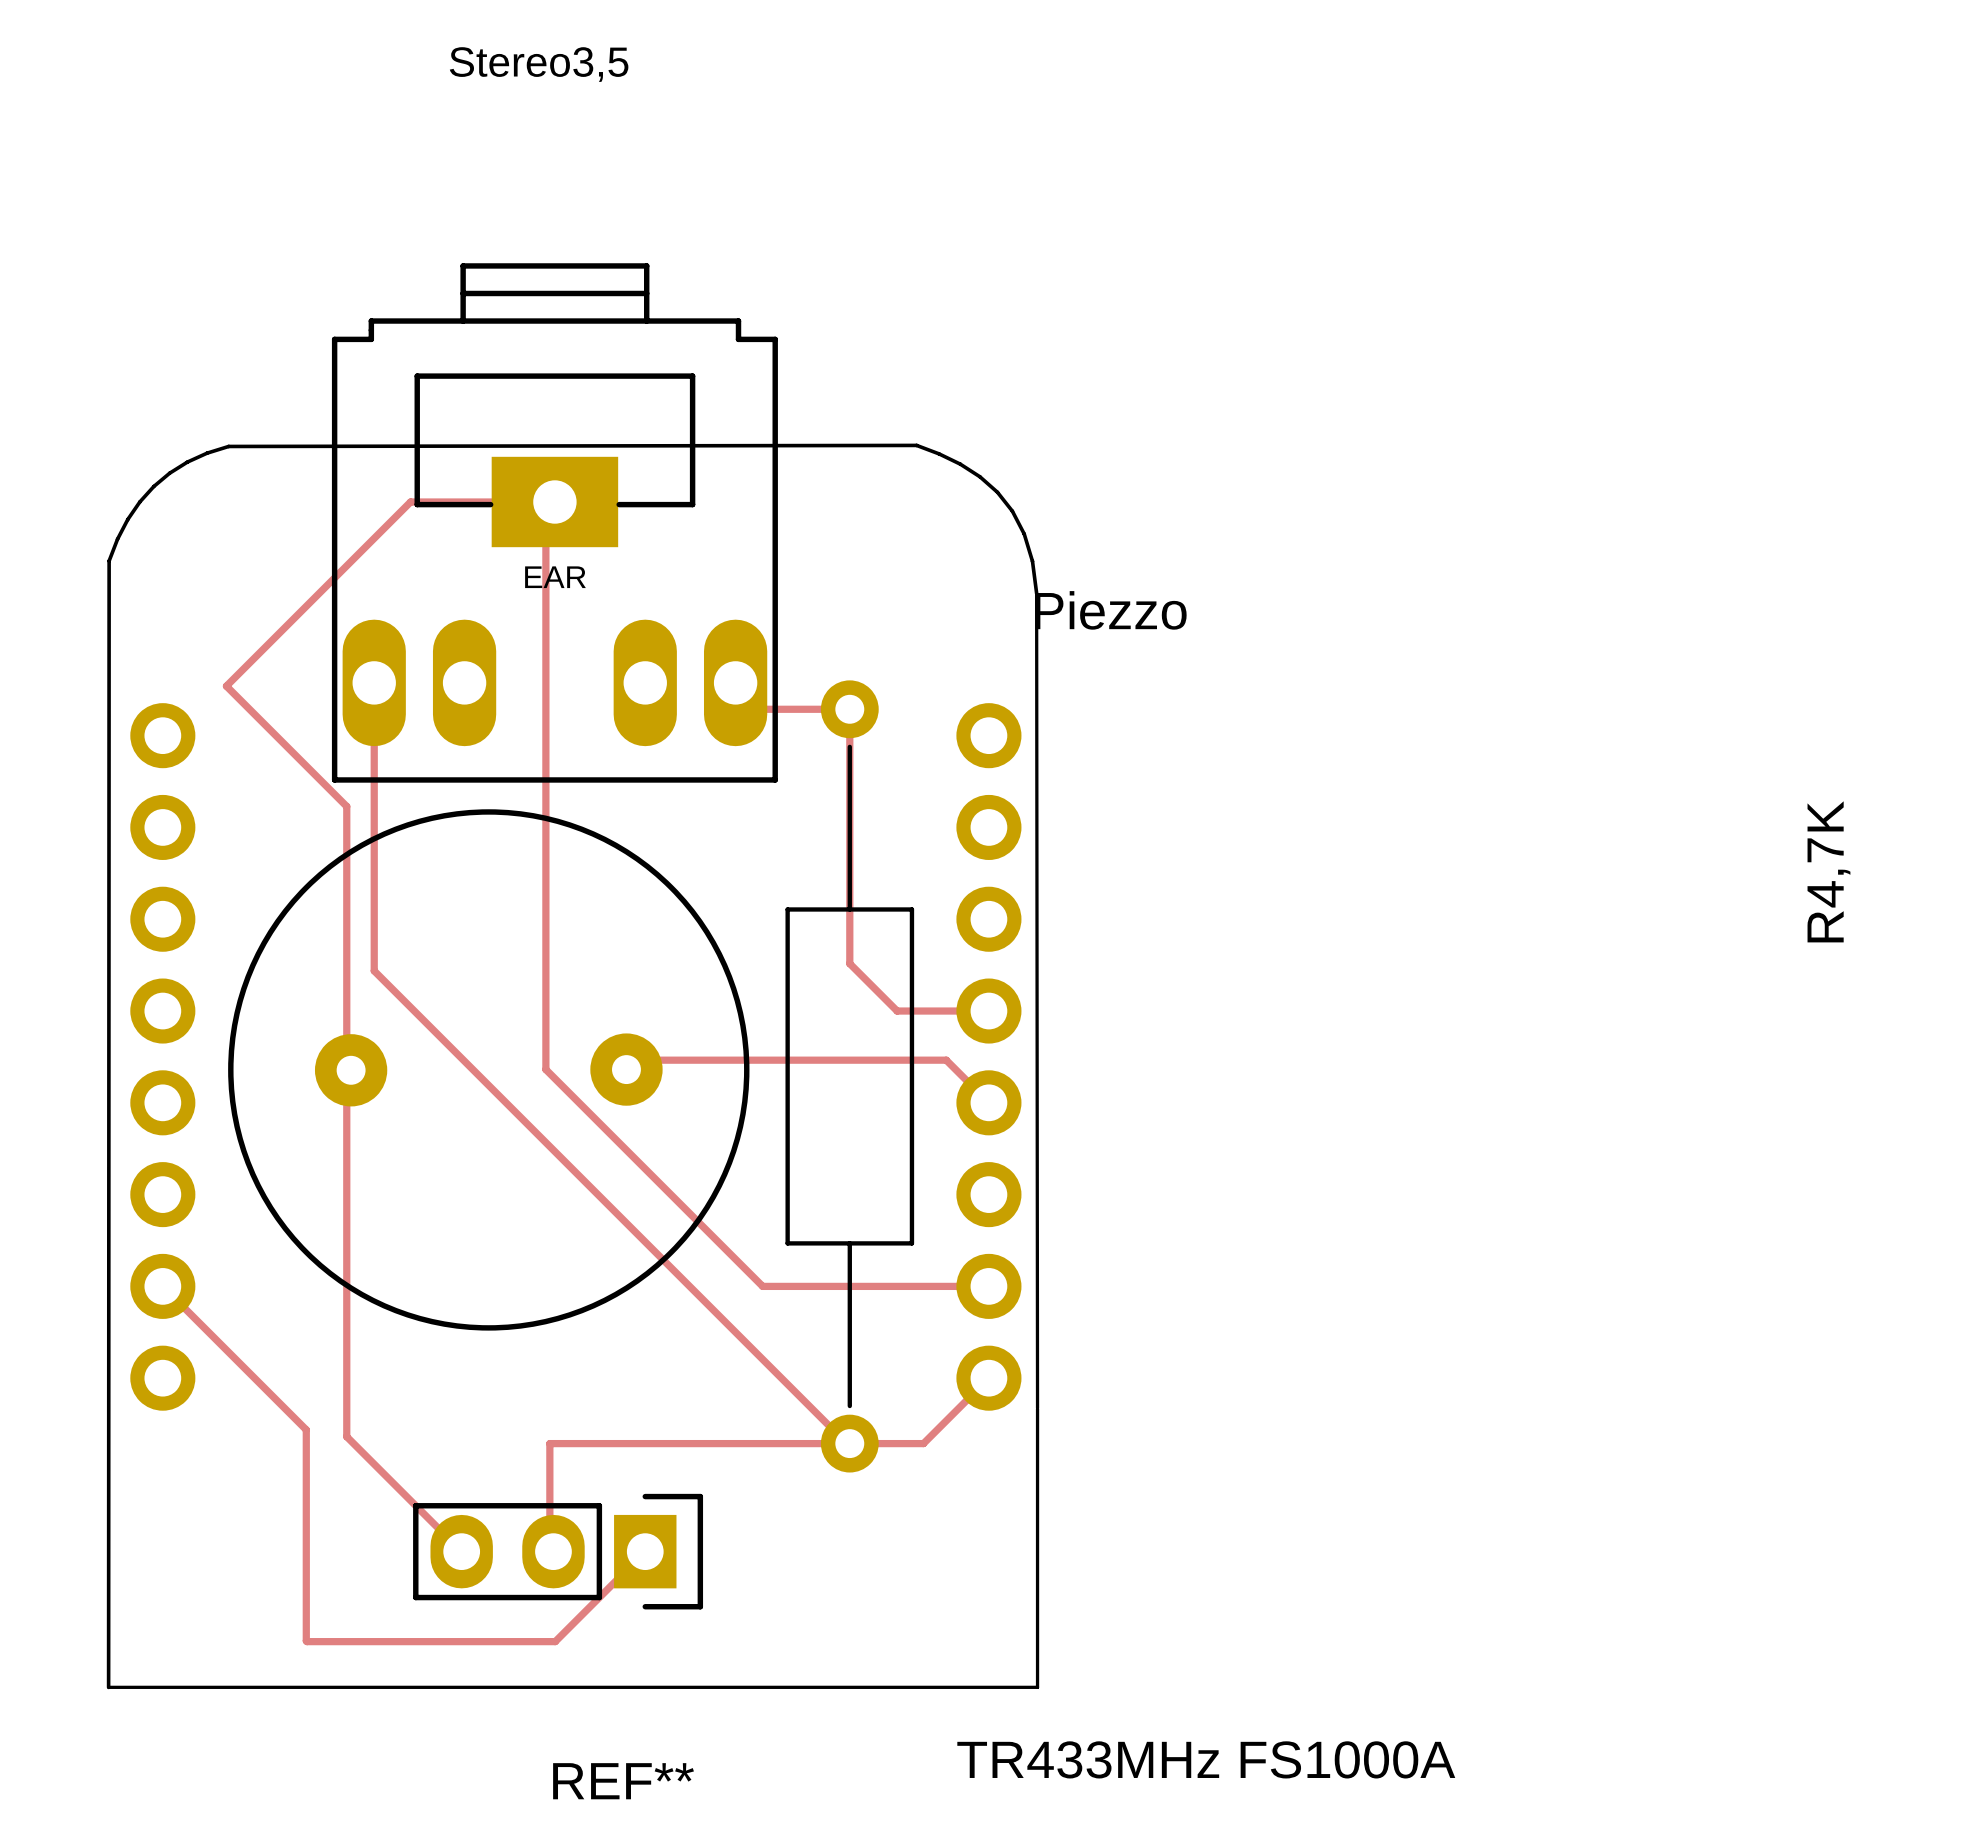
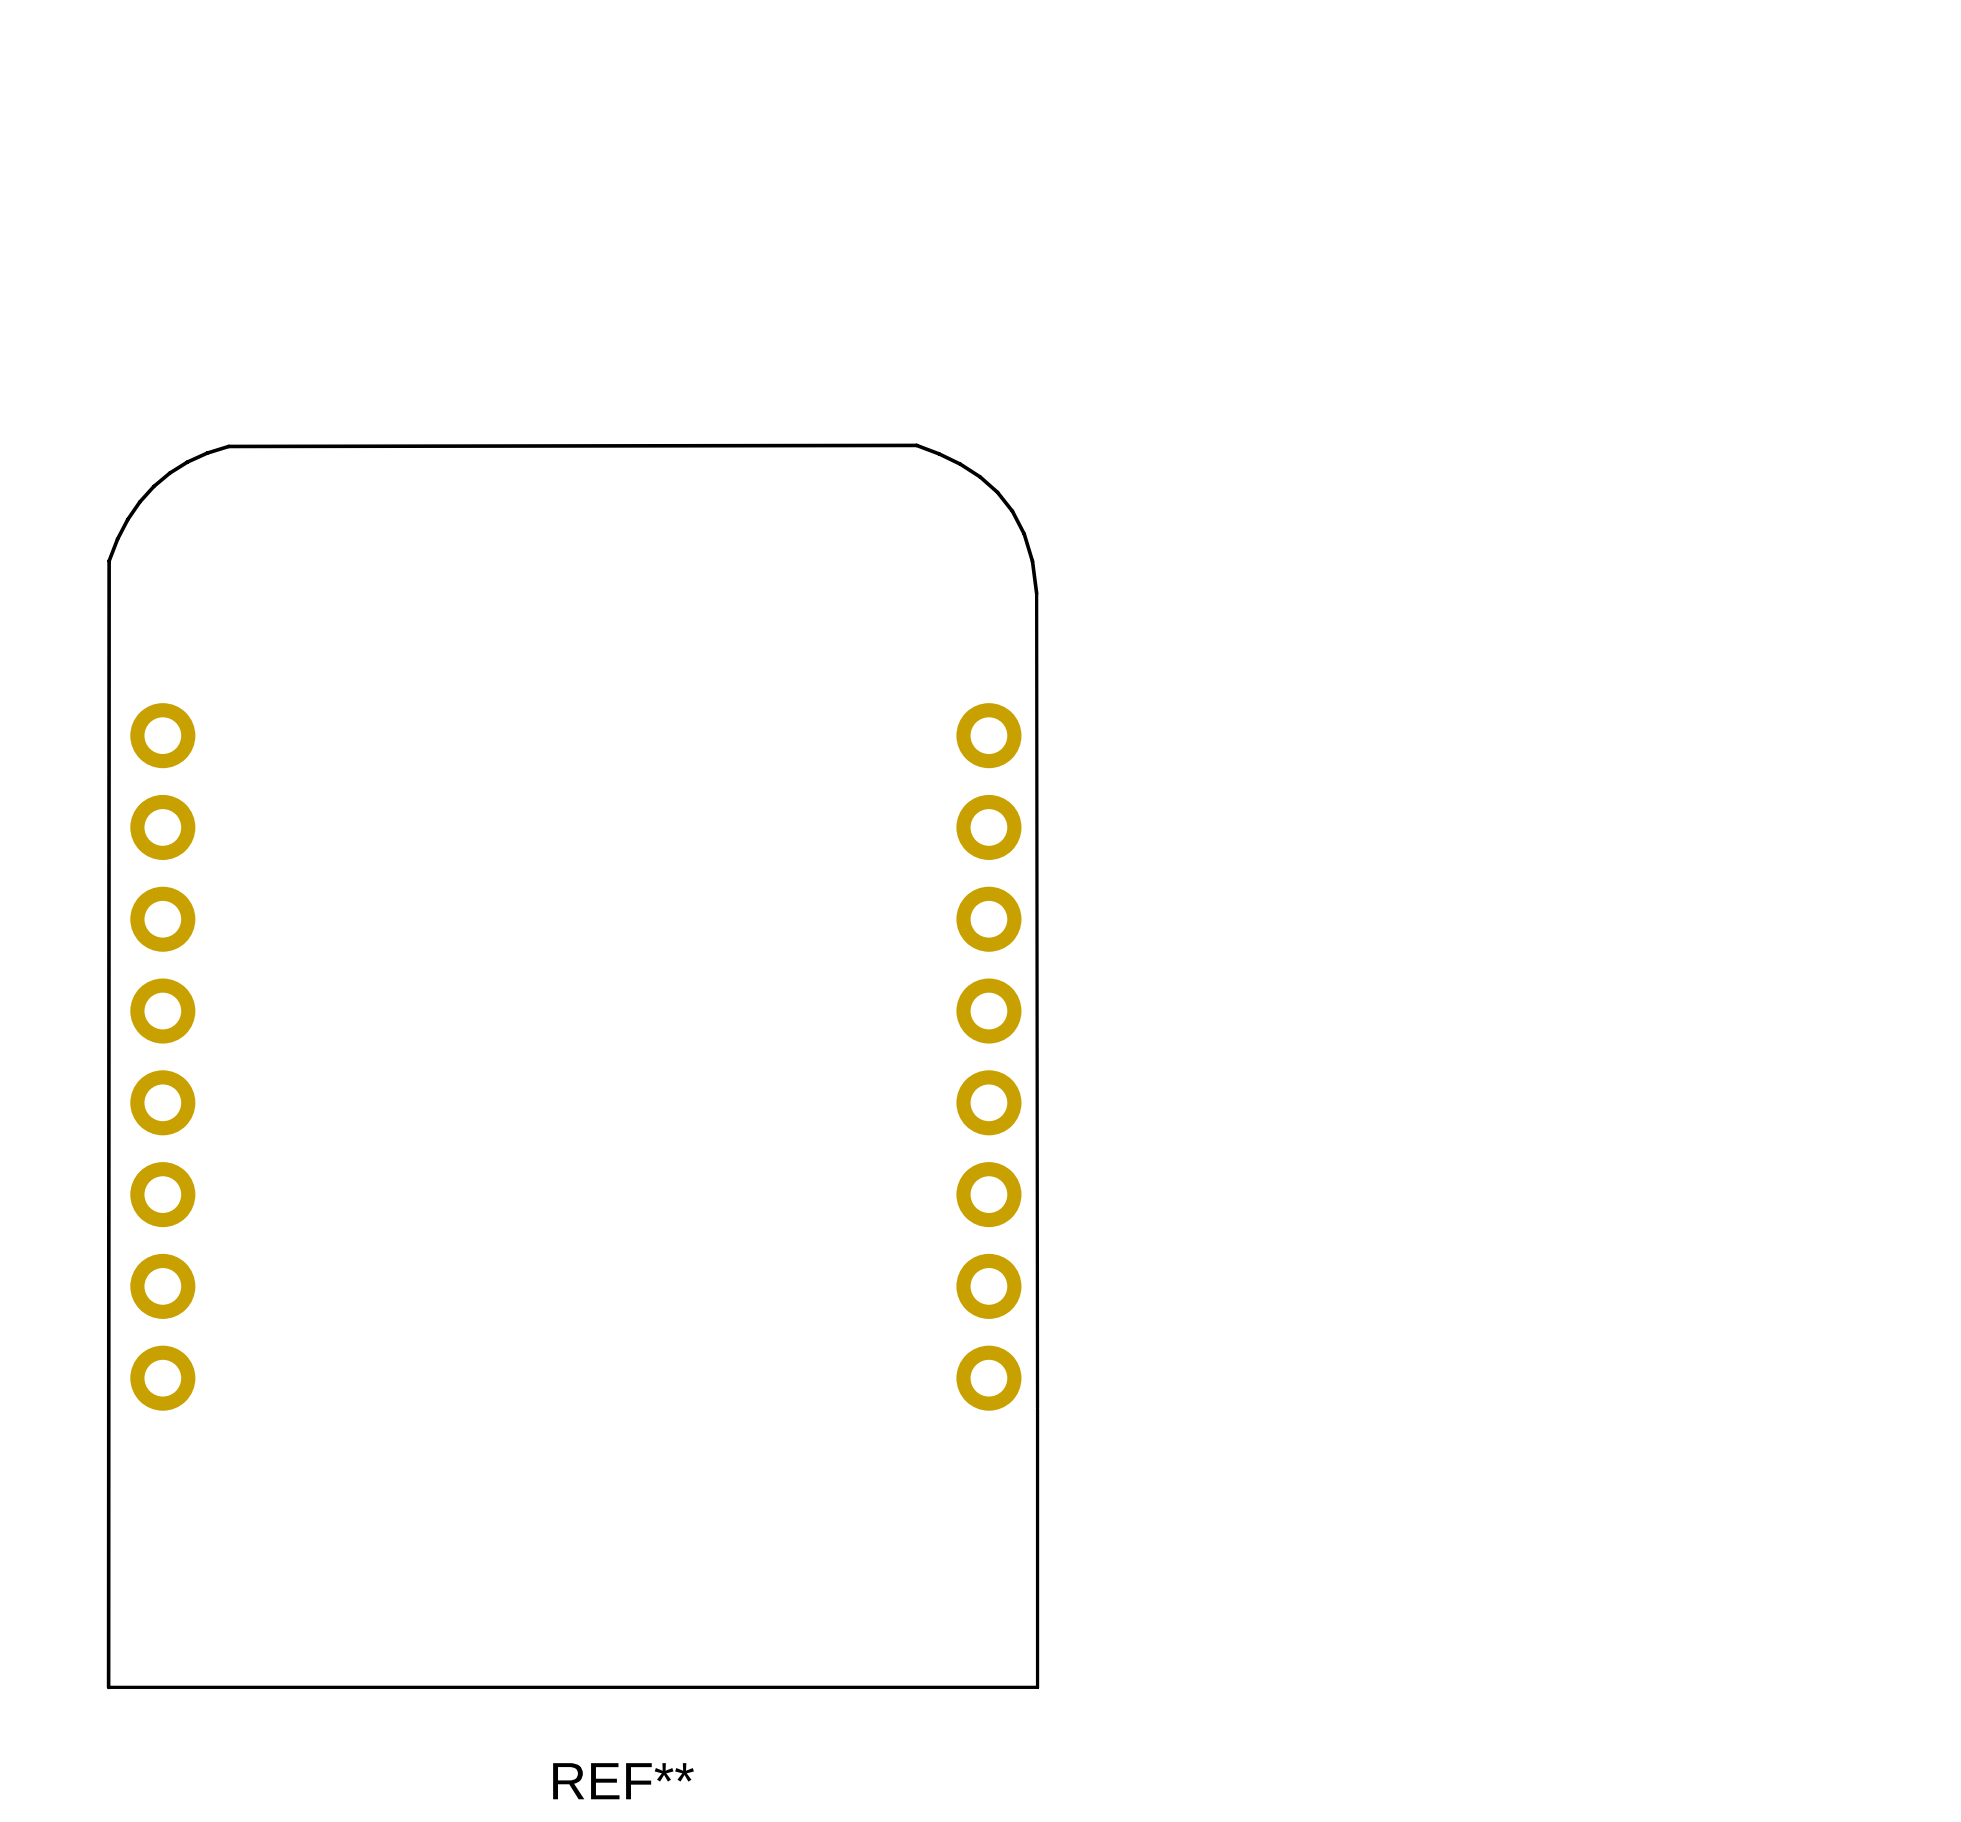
Stereo3,5: EAR (554, 522) -> none
track: (374, 682) (374, 970) (846, 1443) -> none
track: (735, 682) (761, 709) (849, 709) (849, 963) (897, 1011) (988, 1011) -> none
track: (622, 1060) (946, 1060) (988, 1102) -> none
Piezzo: (488, 1069) -> none
R4,7K: (849, 1076) -> none
track: (162, 1286) (306, 1429) (307, 1641) (555, 1641) (645, 1551) -> none
track: (988, 1286) (762, 1286) (545, 1069) (545, 511) (554, 502) (410, 502) (226, 686) (346, 806) (346, 1436) (461, 1551) -> none
track: (988, 1389) (988, 1378) (923, 1443) (549, 1443) (549, 1548) (553, 1551) -> none
TR433MHz FS1000A: (558, 1551) -> none

